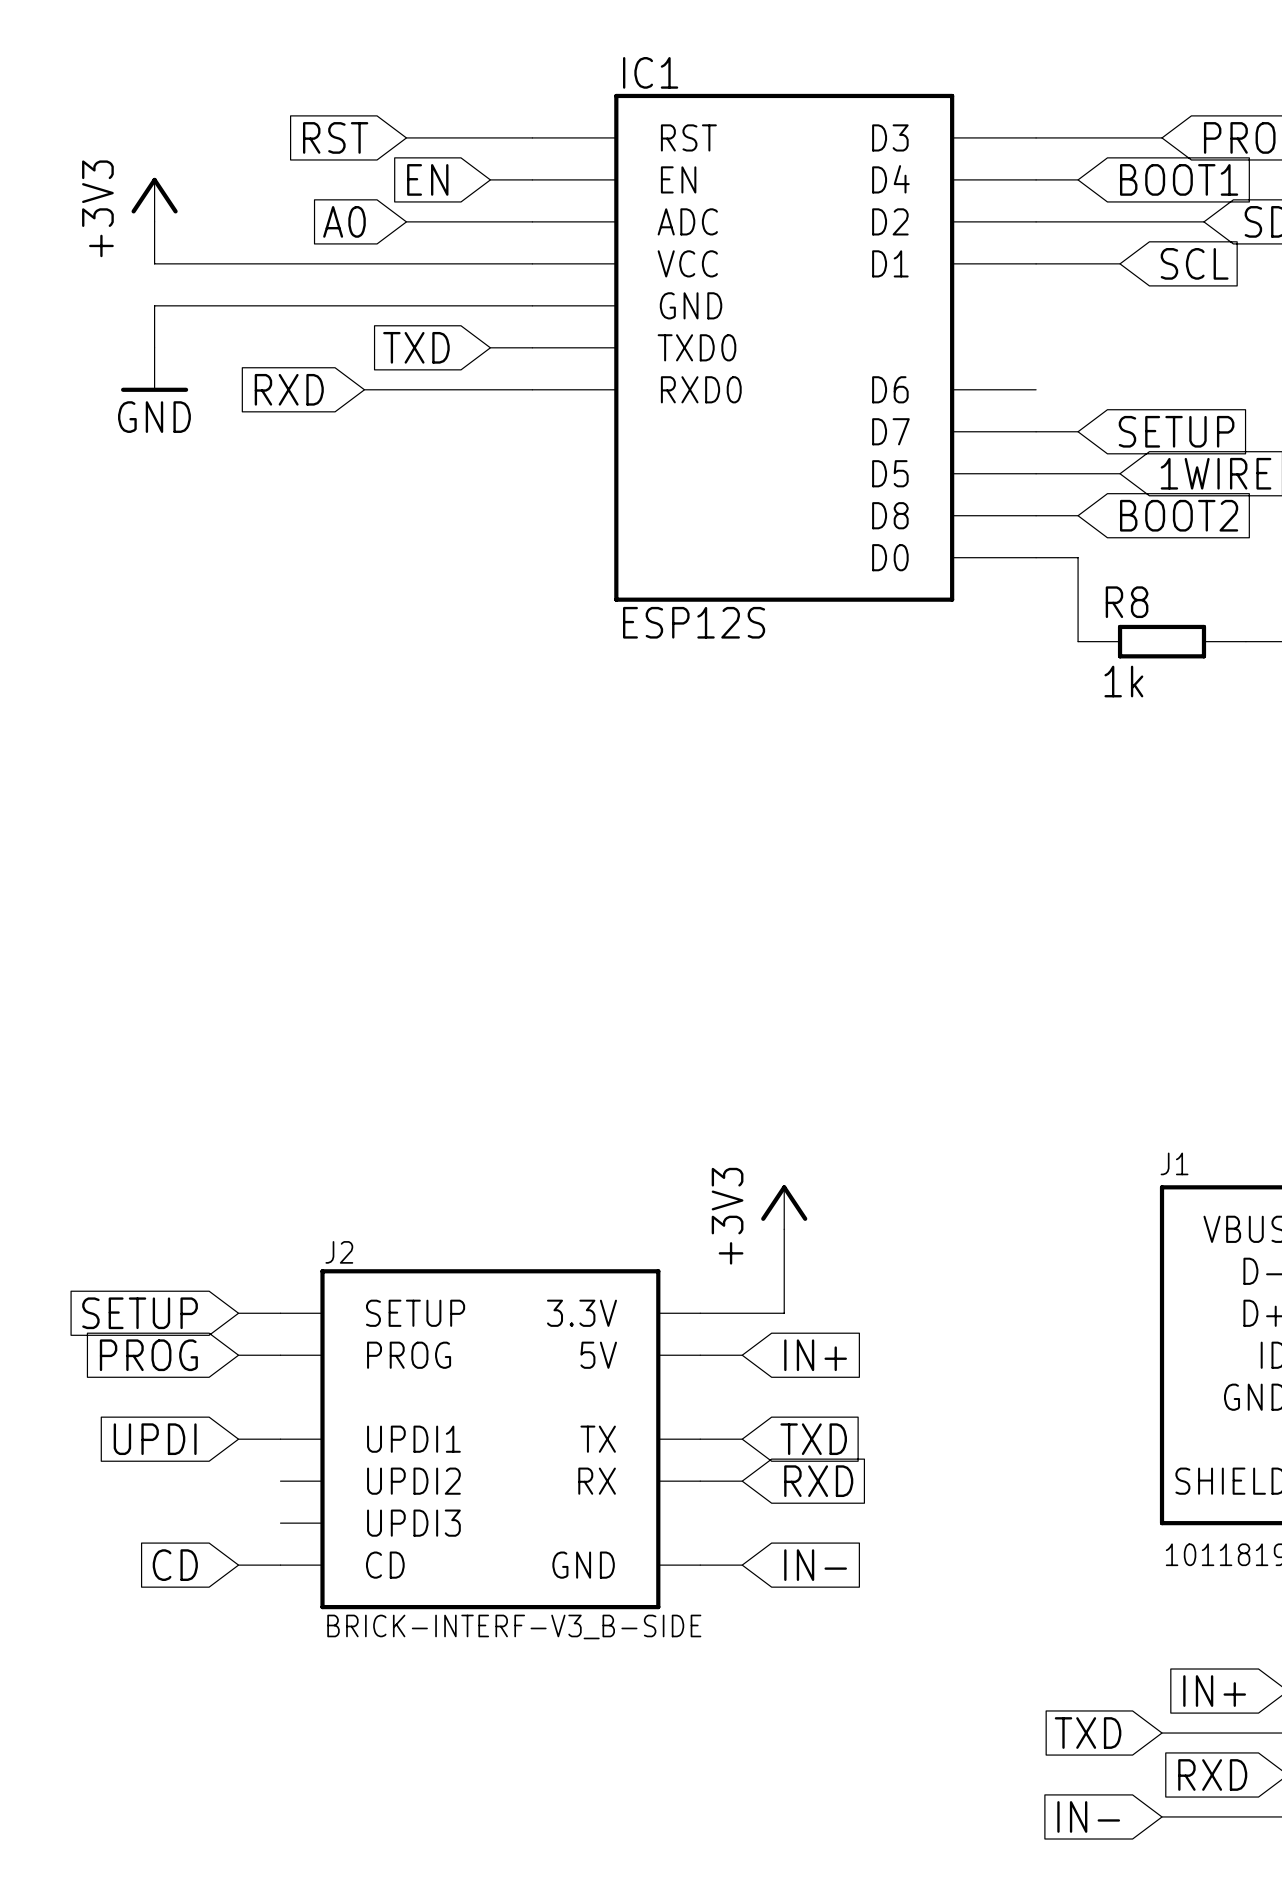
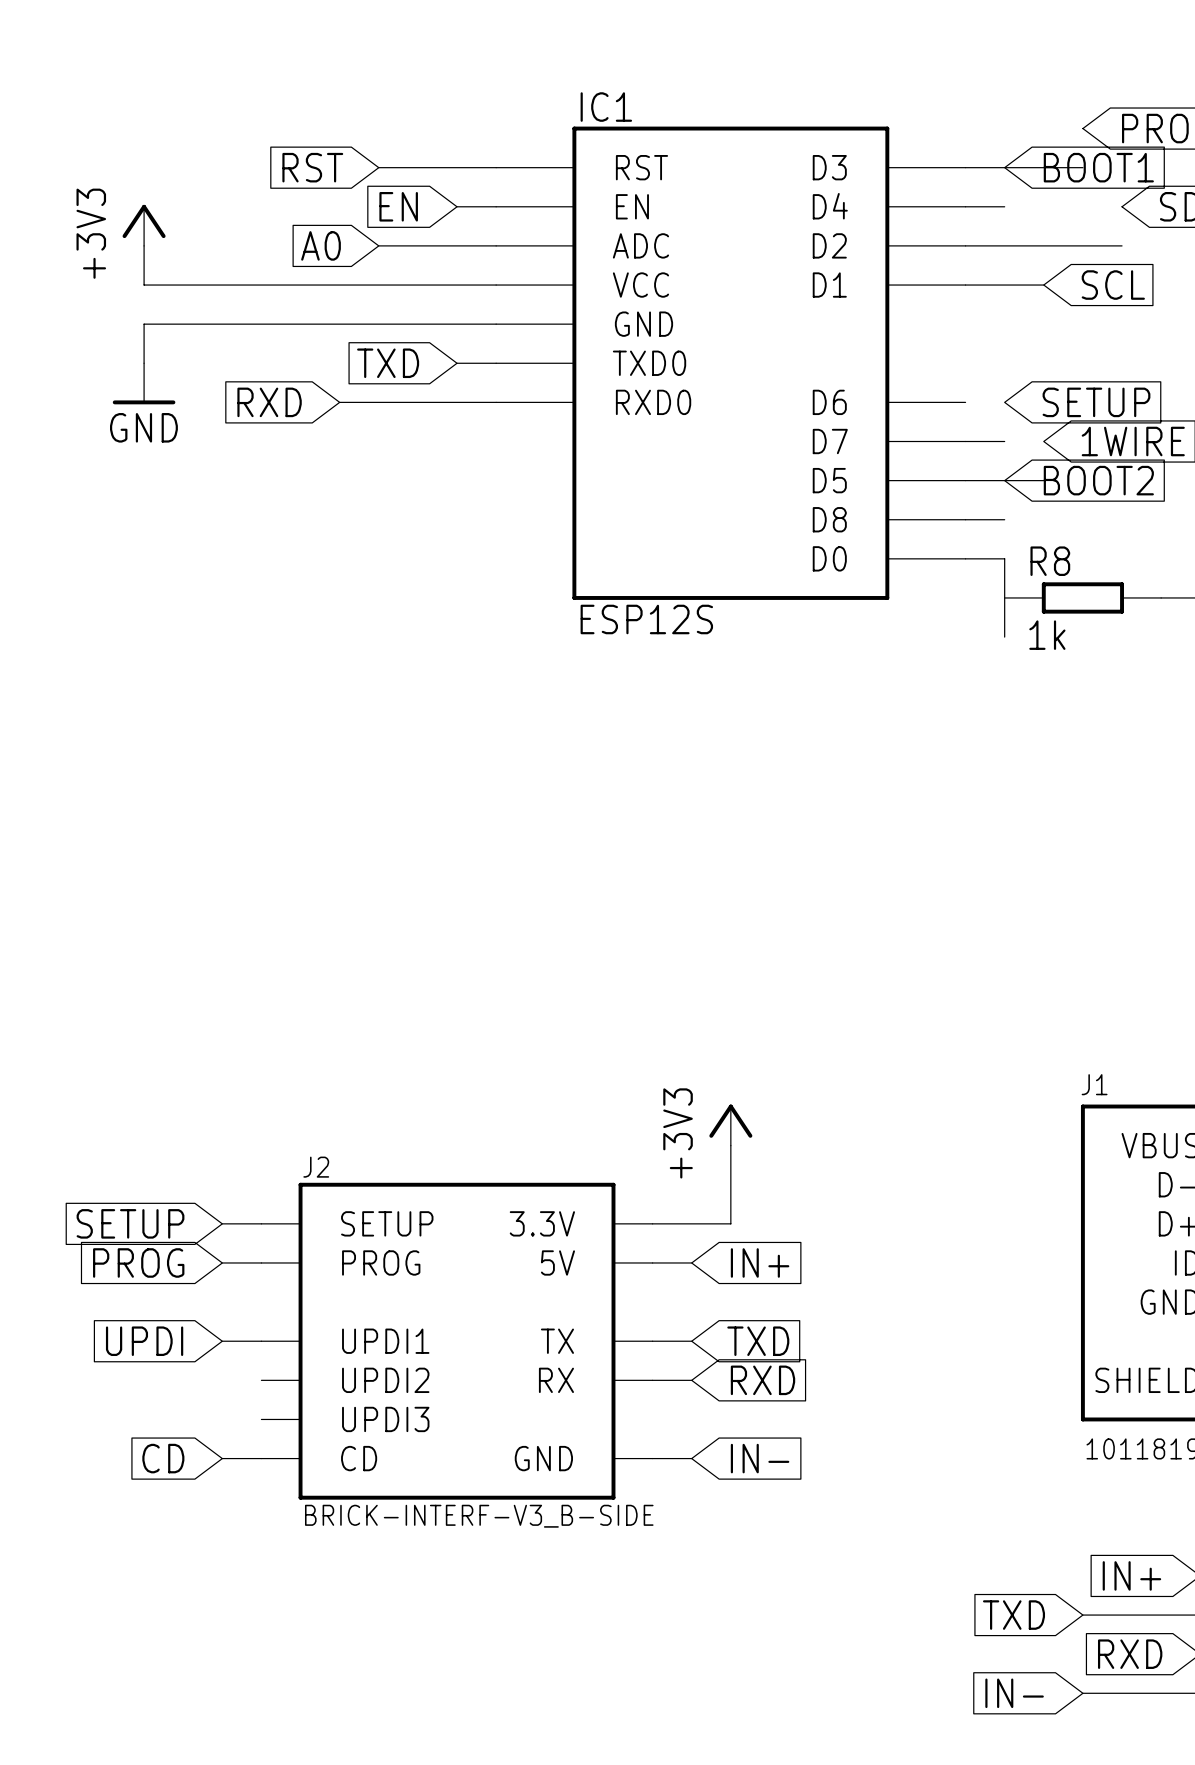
global label position: RST (335, 137) -> RST (312, 167)
wire: (406, 137) (532, 137) -> none
wire: (1036, 137) (1162, 137) -> none
global label position: EN (427, 179) -> EN (398, 206)
wire: none -> (1004, 167) (1082, 167)
power symbol position: +3V3 (154, 199) -> +3V3 (144, 225)
wire: (154, 221) (154, 263) (406, 263) -> none
global label position: A0 (344, 221) -> A0 (321, 245)
wire: (406, 221) (490, 221) -> (378, 167) (457, 167)
wire: (1078, 221) (1203, 221) -> none
wire: none -> (1043, 245) (1122, 245)
global label position: SCL (1194, 263) -> SCL (1113, 285)
wire: (154, 305) (154, 347) -> (144, 285) (144, 245)
wire: none -> (965, 285) (1043, 285)
global label position: TXD (416, 347) -> TXD (388, 363)
wire: none -> (457, 324) (144, 324) (144, 363)
IC1 position: (784, 347) -> (730, 363)
power symbol position: GND (154, 369) -> GND (144, 383)
global label position: RXD (289, 389) -> RXD (269, 402)
wire: (364, 389) (490, 389) -> none
wire: none -> (339, 402) (496, 402)
wire: (1036, 431) (1078, 431) -> none
wire: (1078, 473) (1120, 473) -> (1004, 480) (1043, 480)
wire: (1078, 557) (1078, 599) -> (965, 558) (1004, 558)
wire: none -> (1004, 597) (1004, 637)

